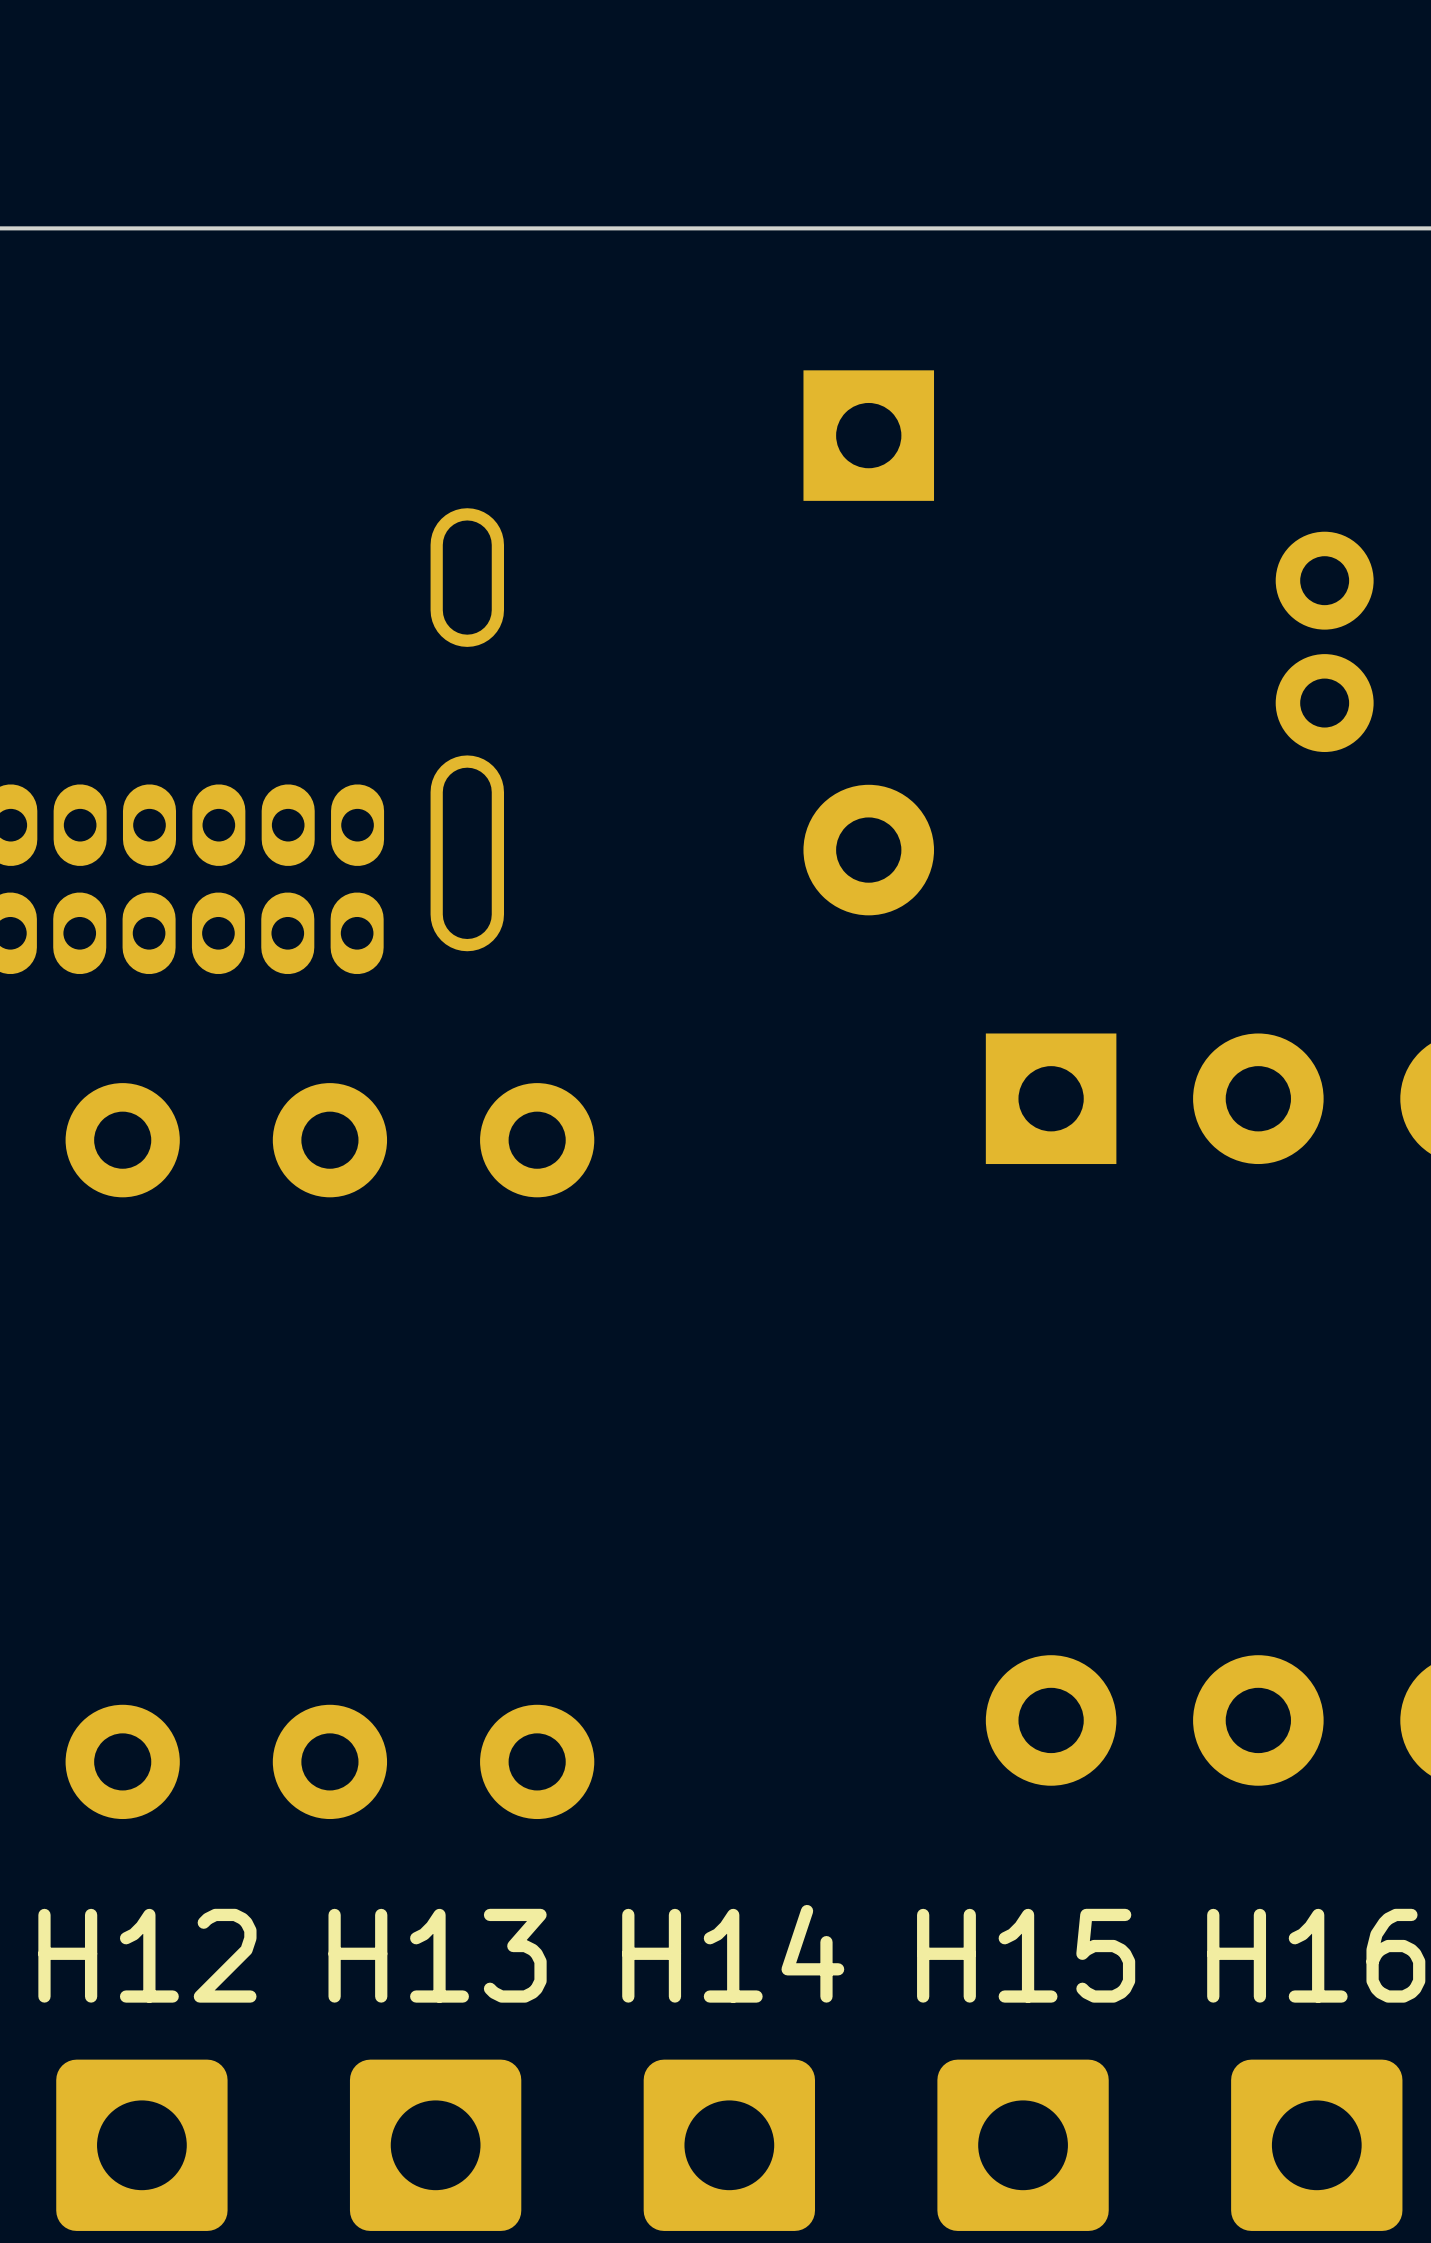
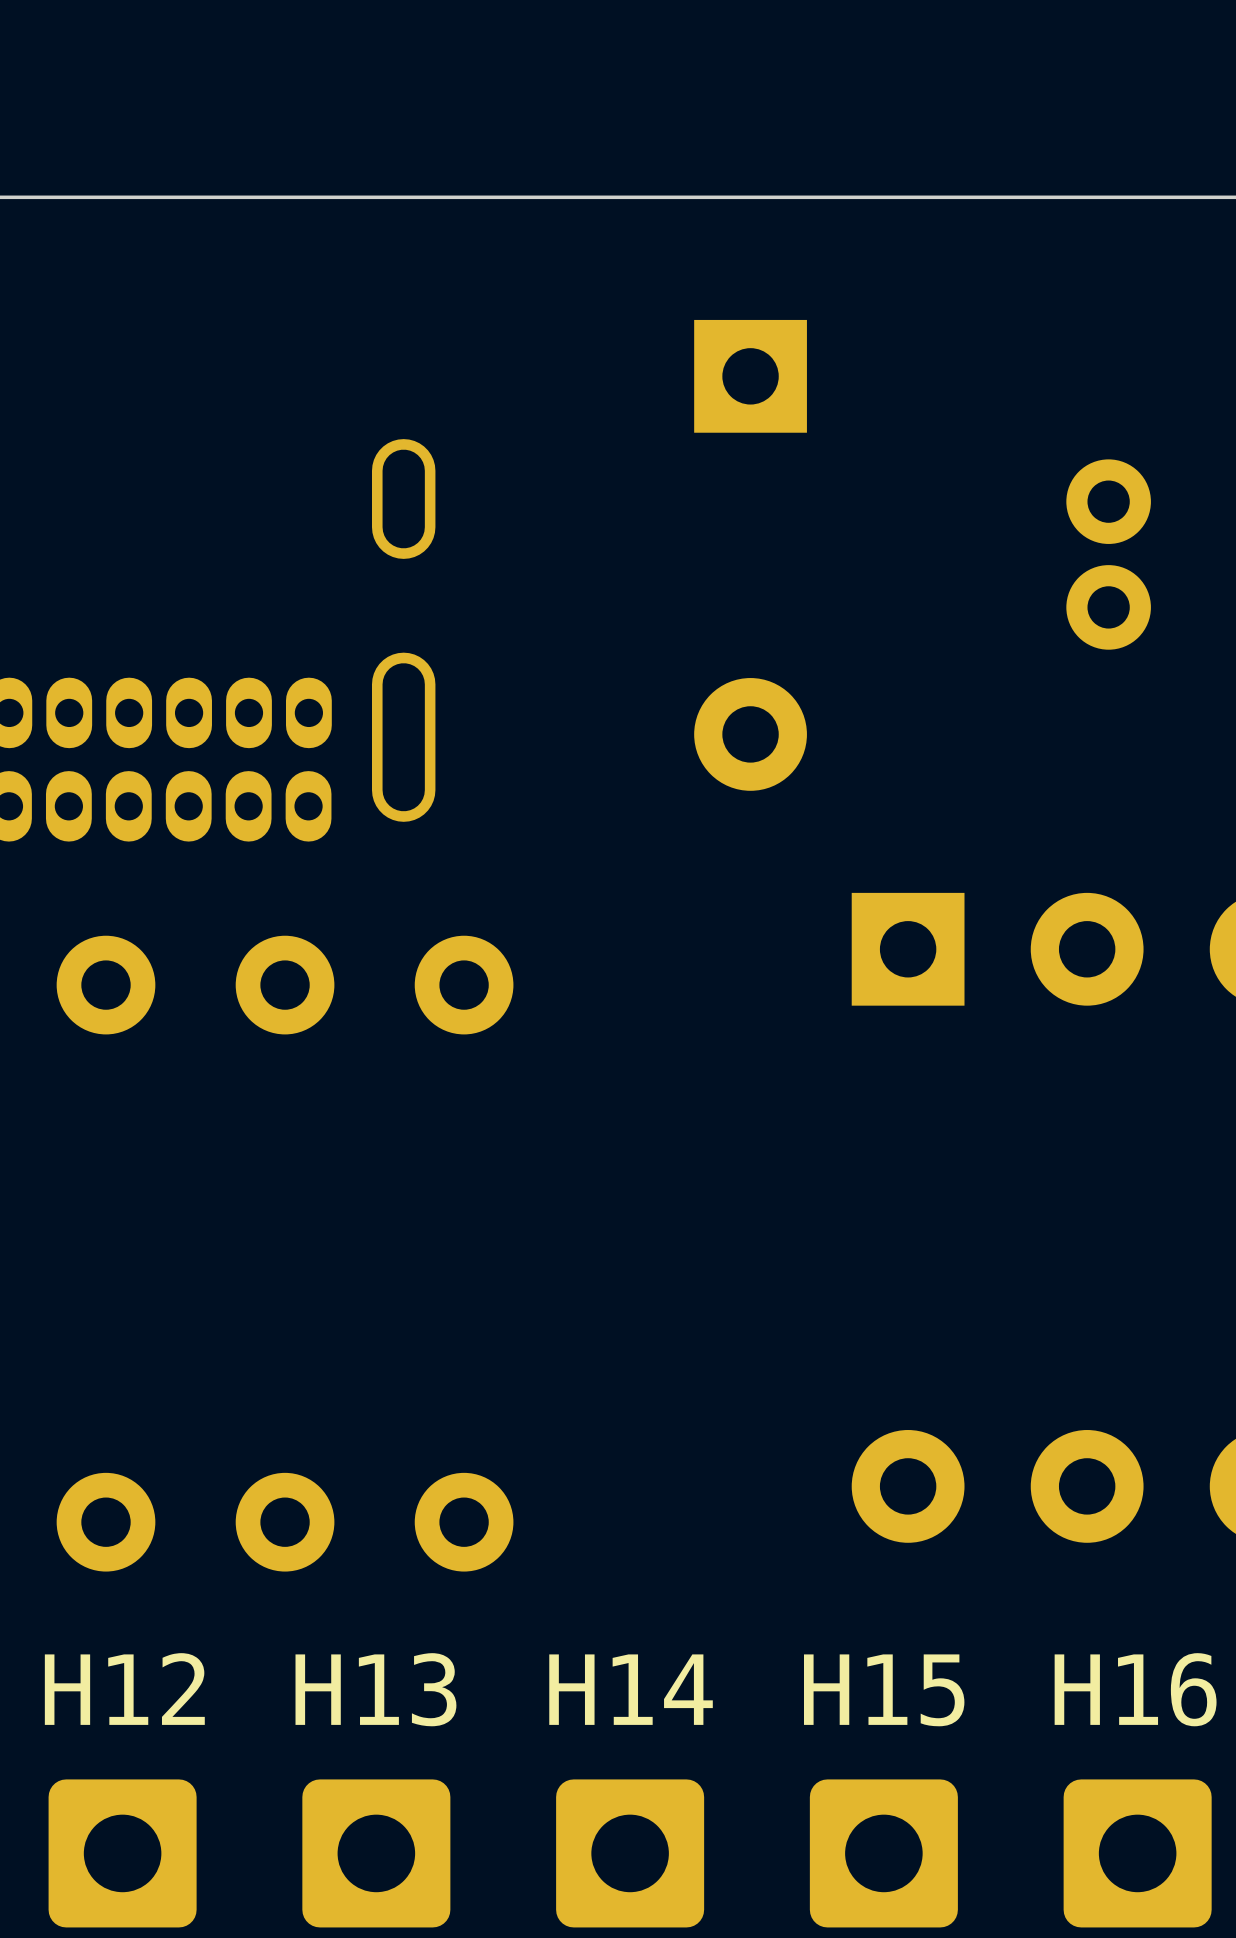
part position: (1324, 641) -> (1108, 554)

